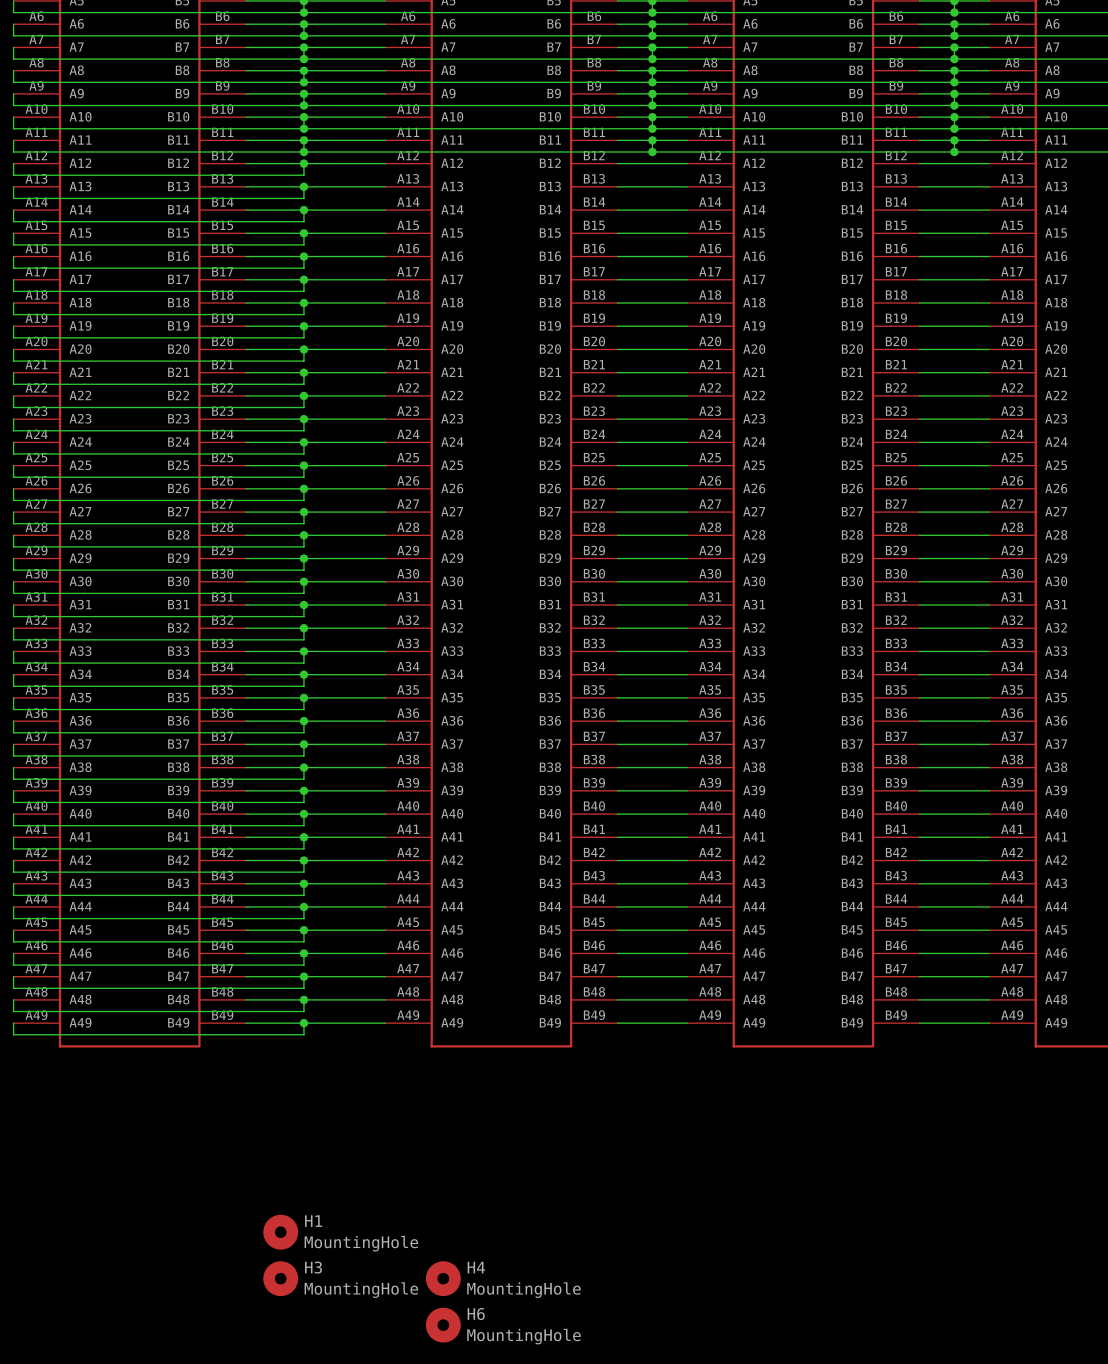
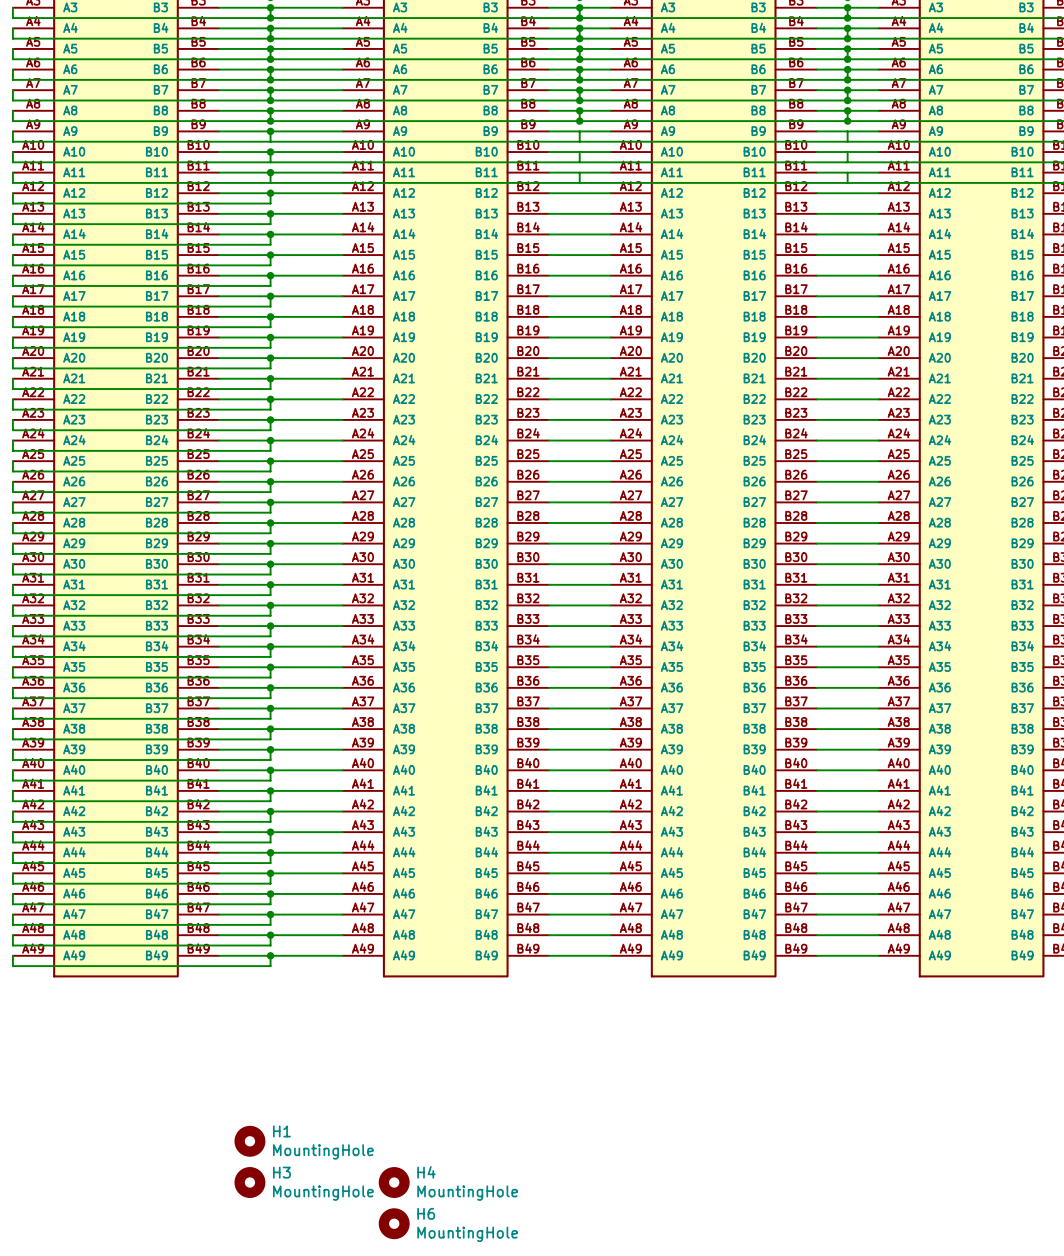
junction: (652, 93) -> none
junction: (954, 93) -> none
junction: (303, 105) -> none
junction: (652, 105) -> none
junction: (954, 105) -> none
junction: (652, 117) -> none
junction: (954, 117) -> none
junction: (303, 128) -> none
junction: (652, 128) -> none
junction: (954, 128) -> none
junction: (652, 140) -> none
junction: (954, 140) -> none
junction: (303, 151) -> none
junction: (652, 151) -> none
junction: (954, 151) -> none

